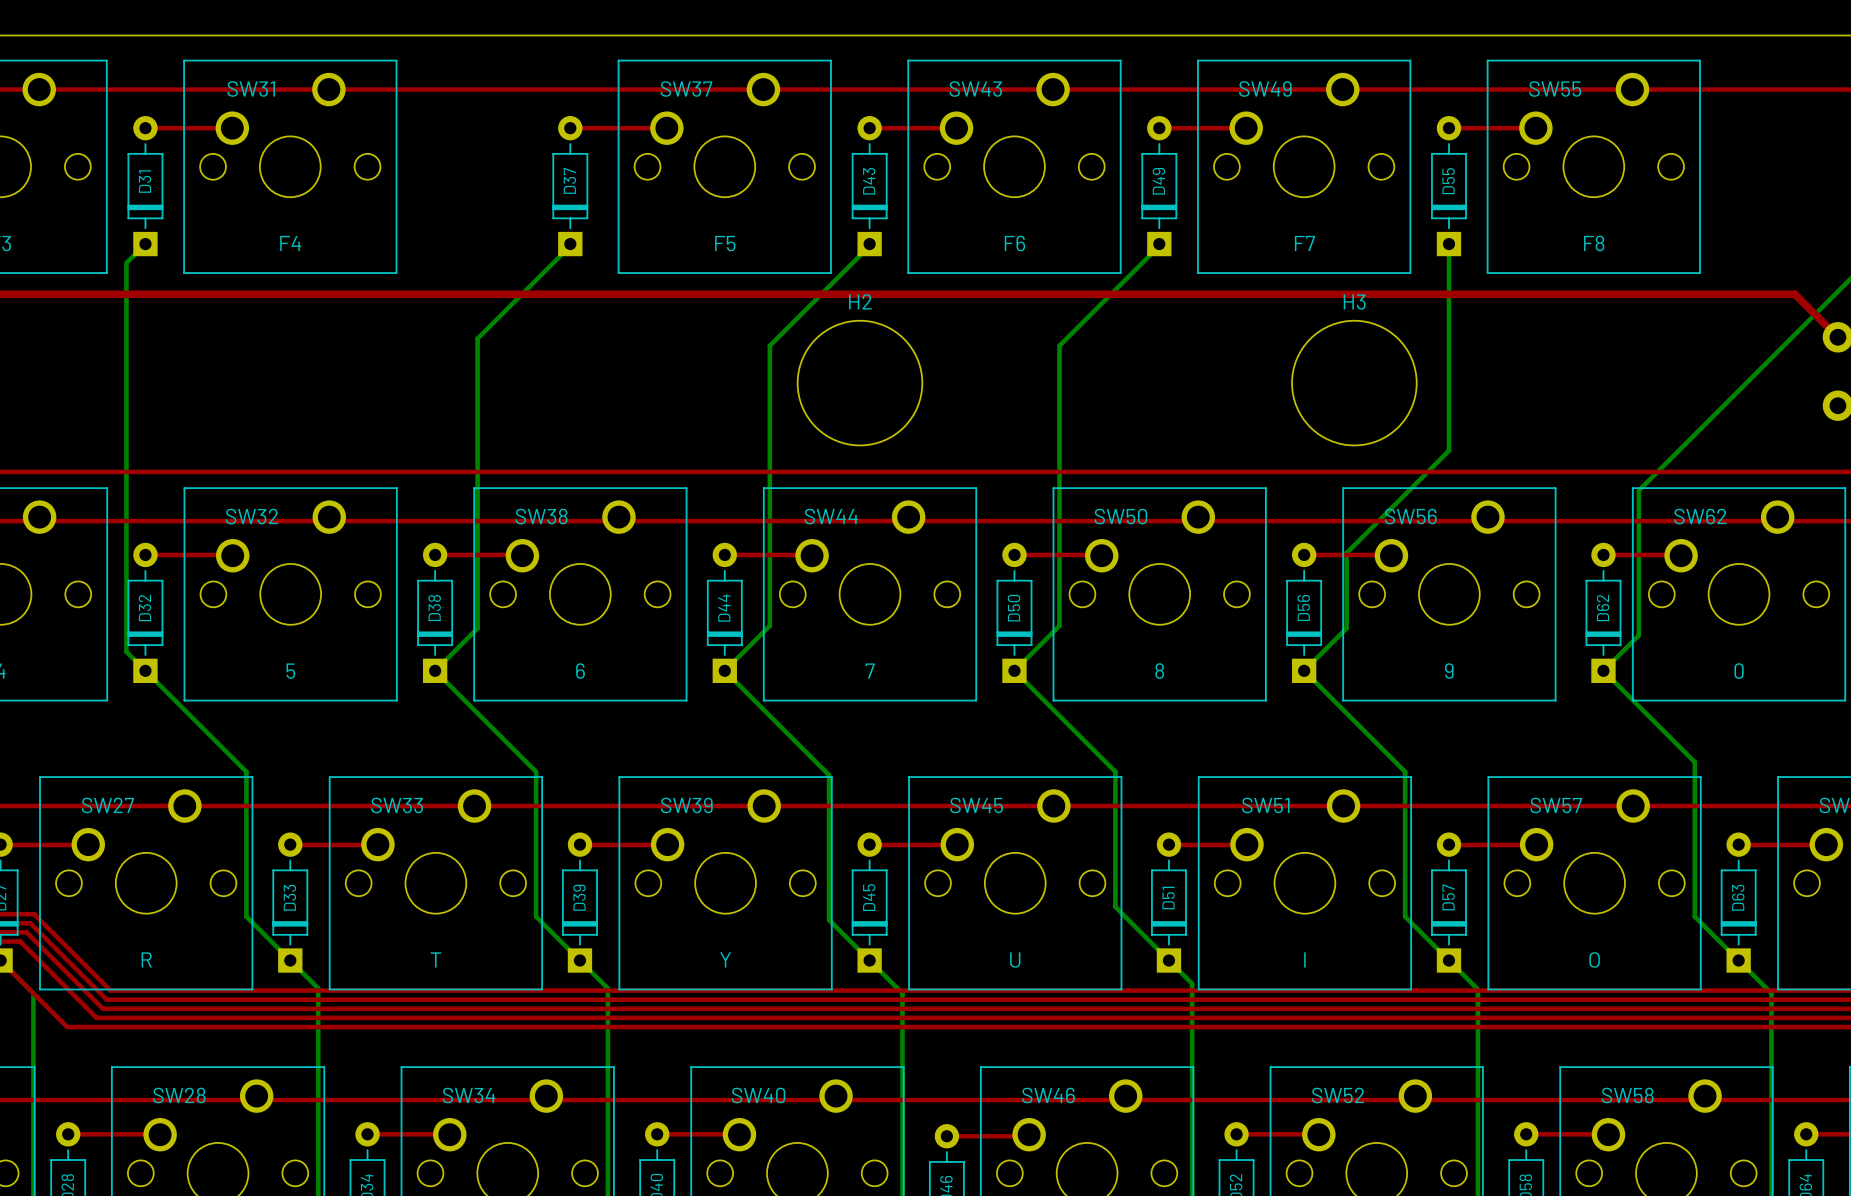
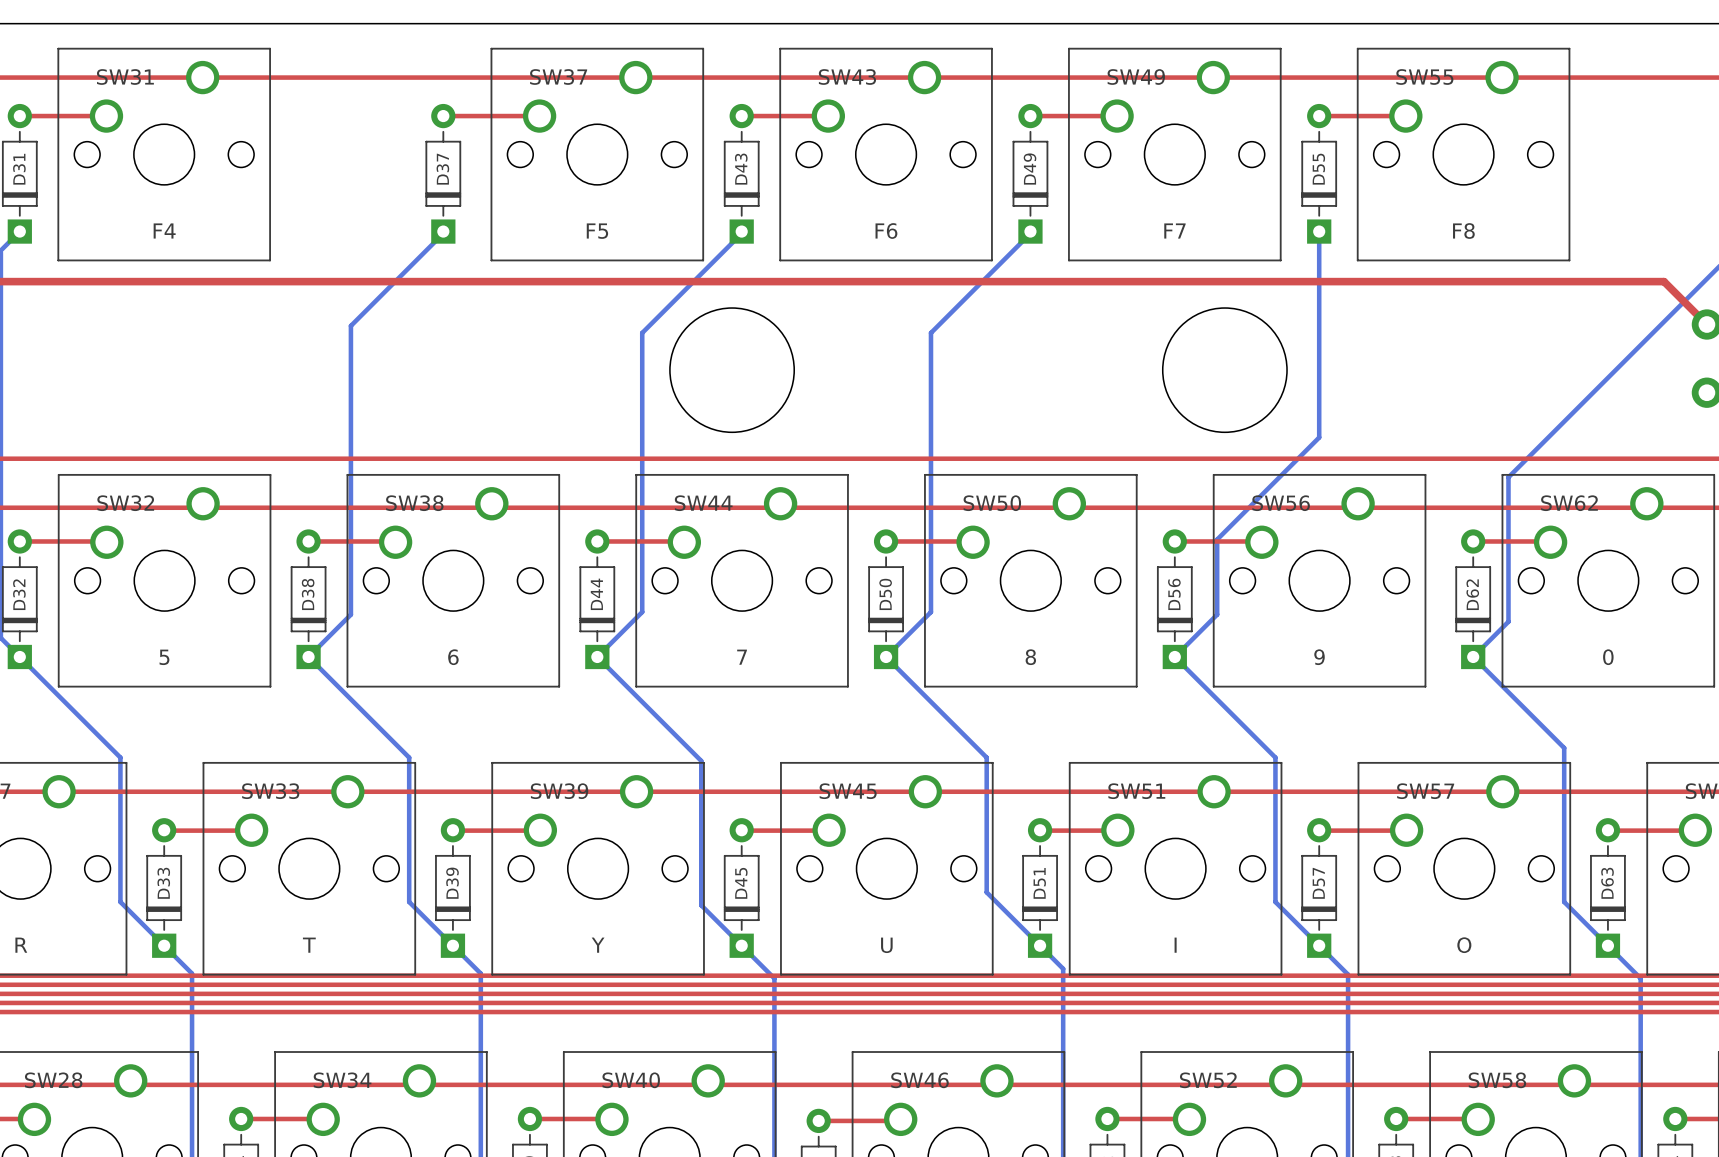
H2 name: H2 (860, 301) -> none
H3 name: H3 (1354, 302) -> none

